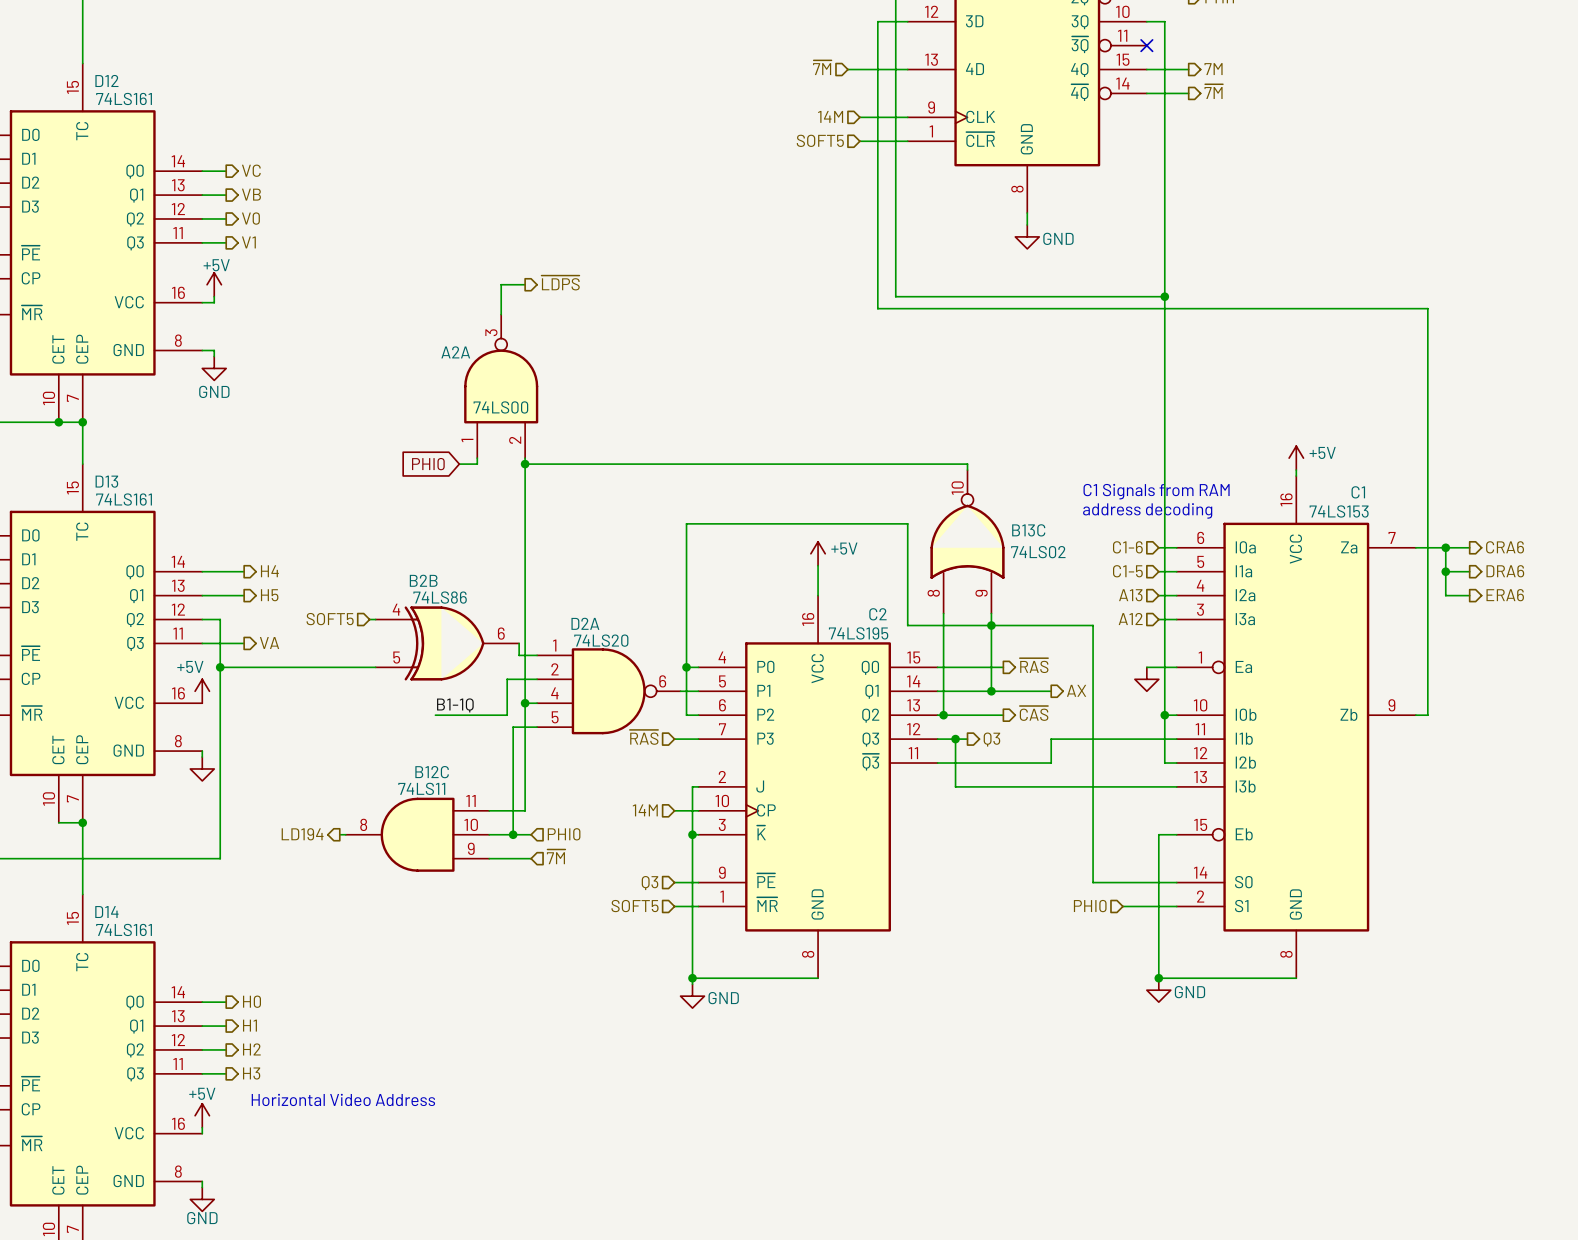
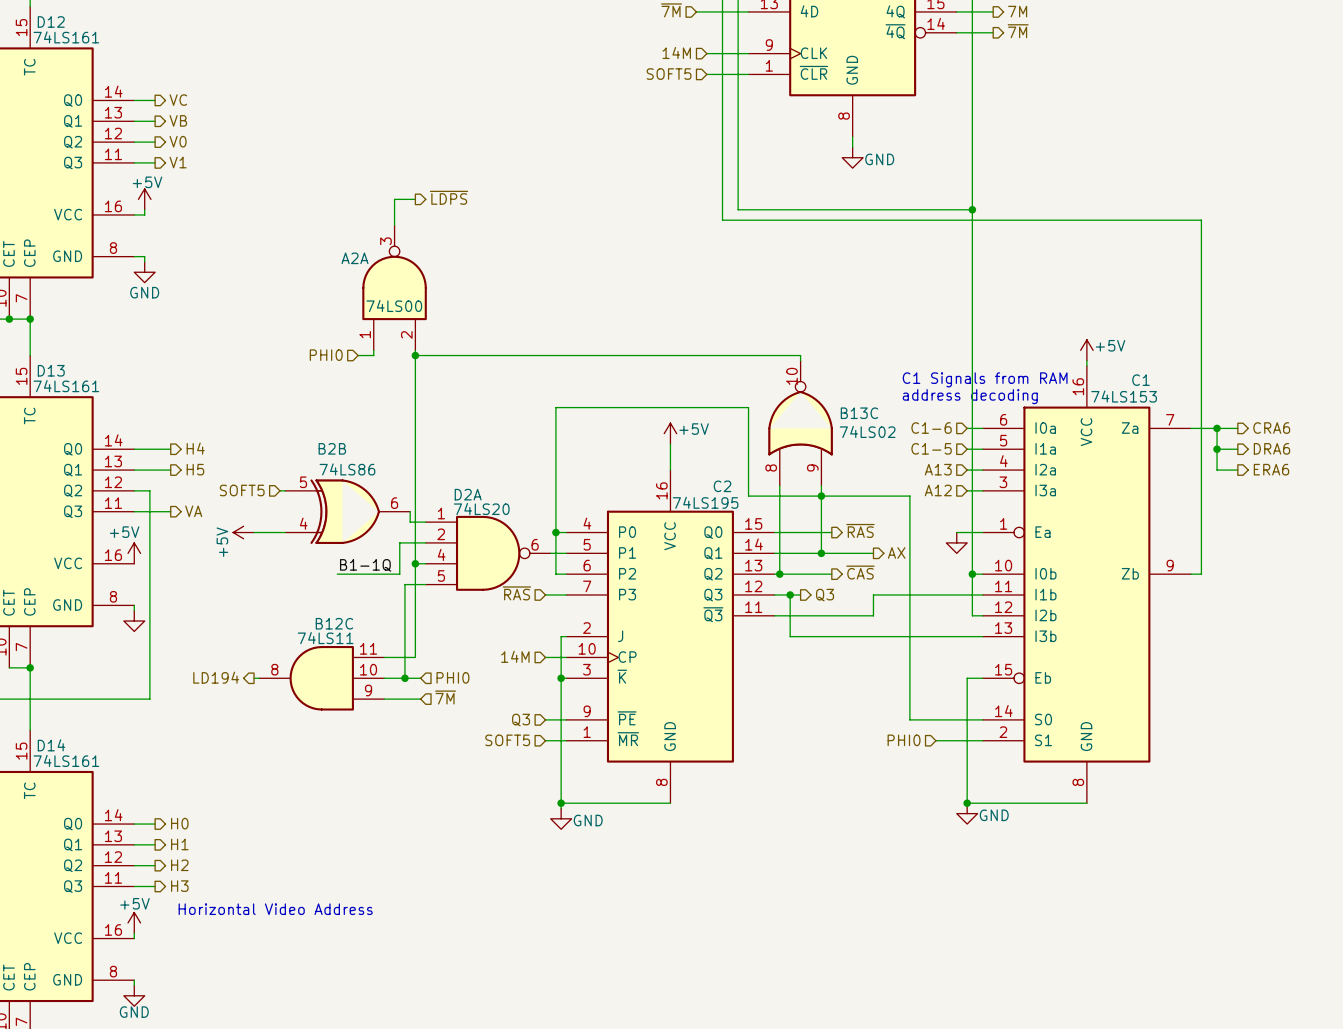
hierarchical label: none -> PHI0 (326, 355)
global label: PHI0 (428, 464) -> none
B2B flip: as is (444, 643) -> up-down (345, 511)
wire: (220, 667) (339, 667) -> none
junction: (220, 667) -> none
power symbol: none -> +5V (243, 532)

